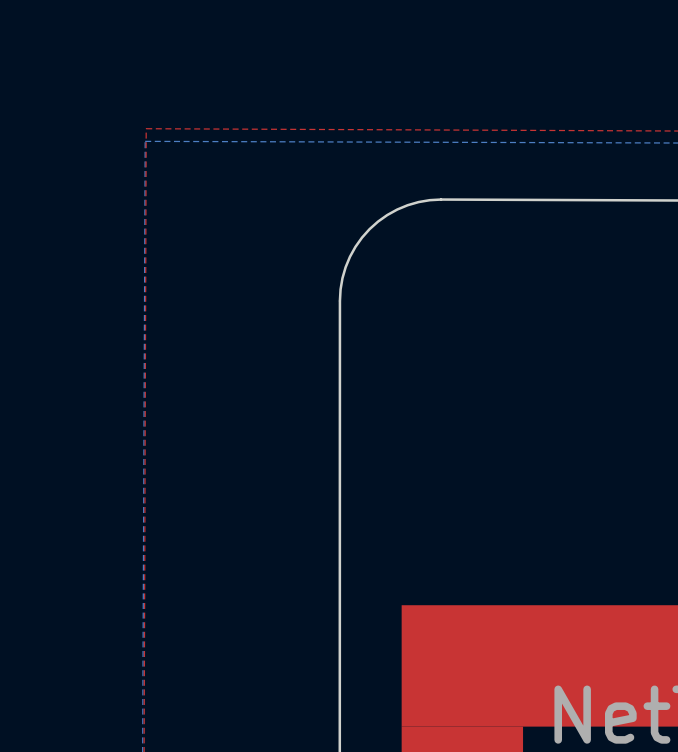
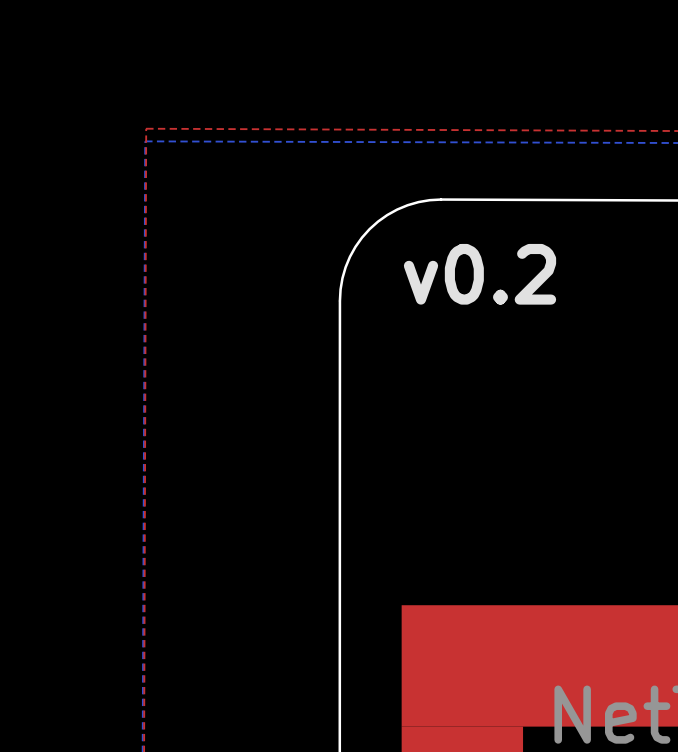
text: none -> v0.2 (480, 274)

